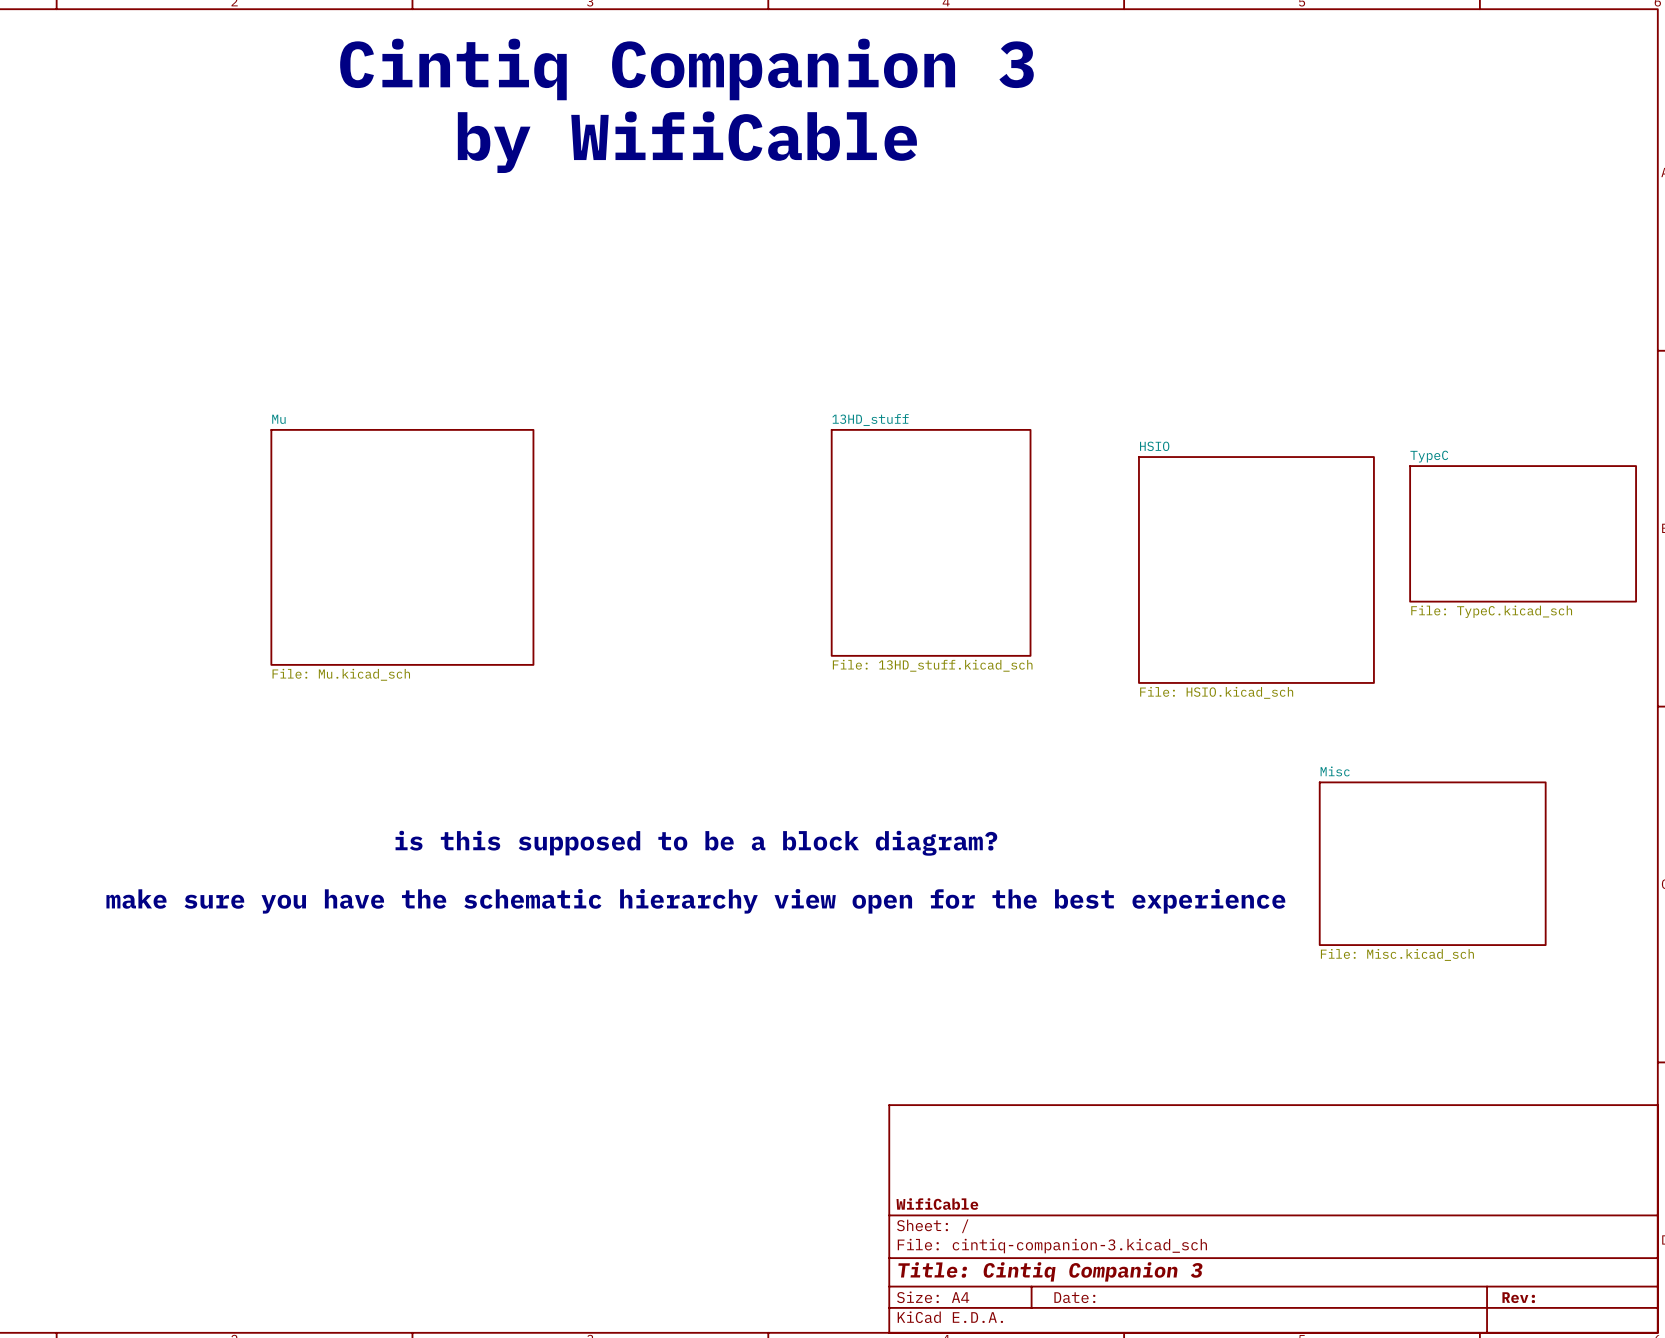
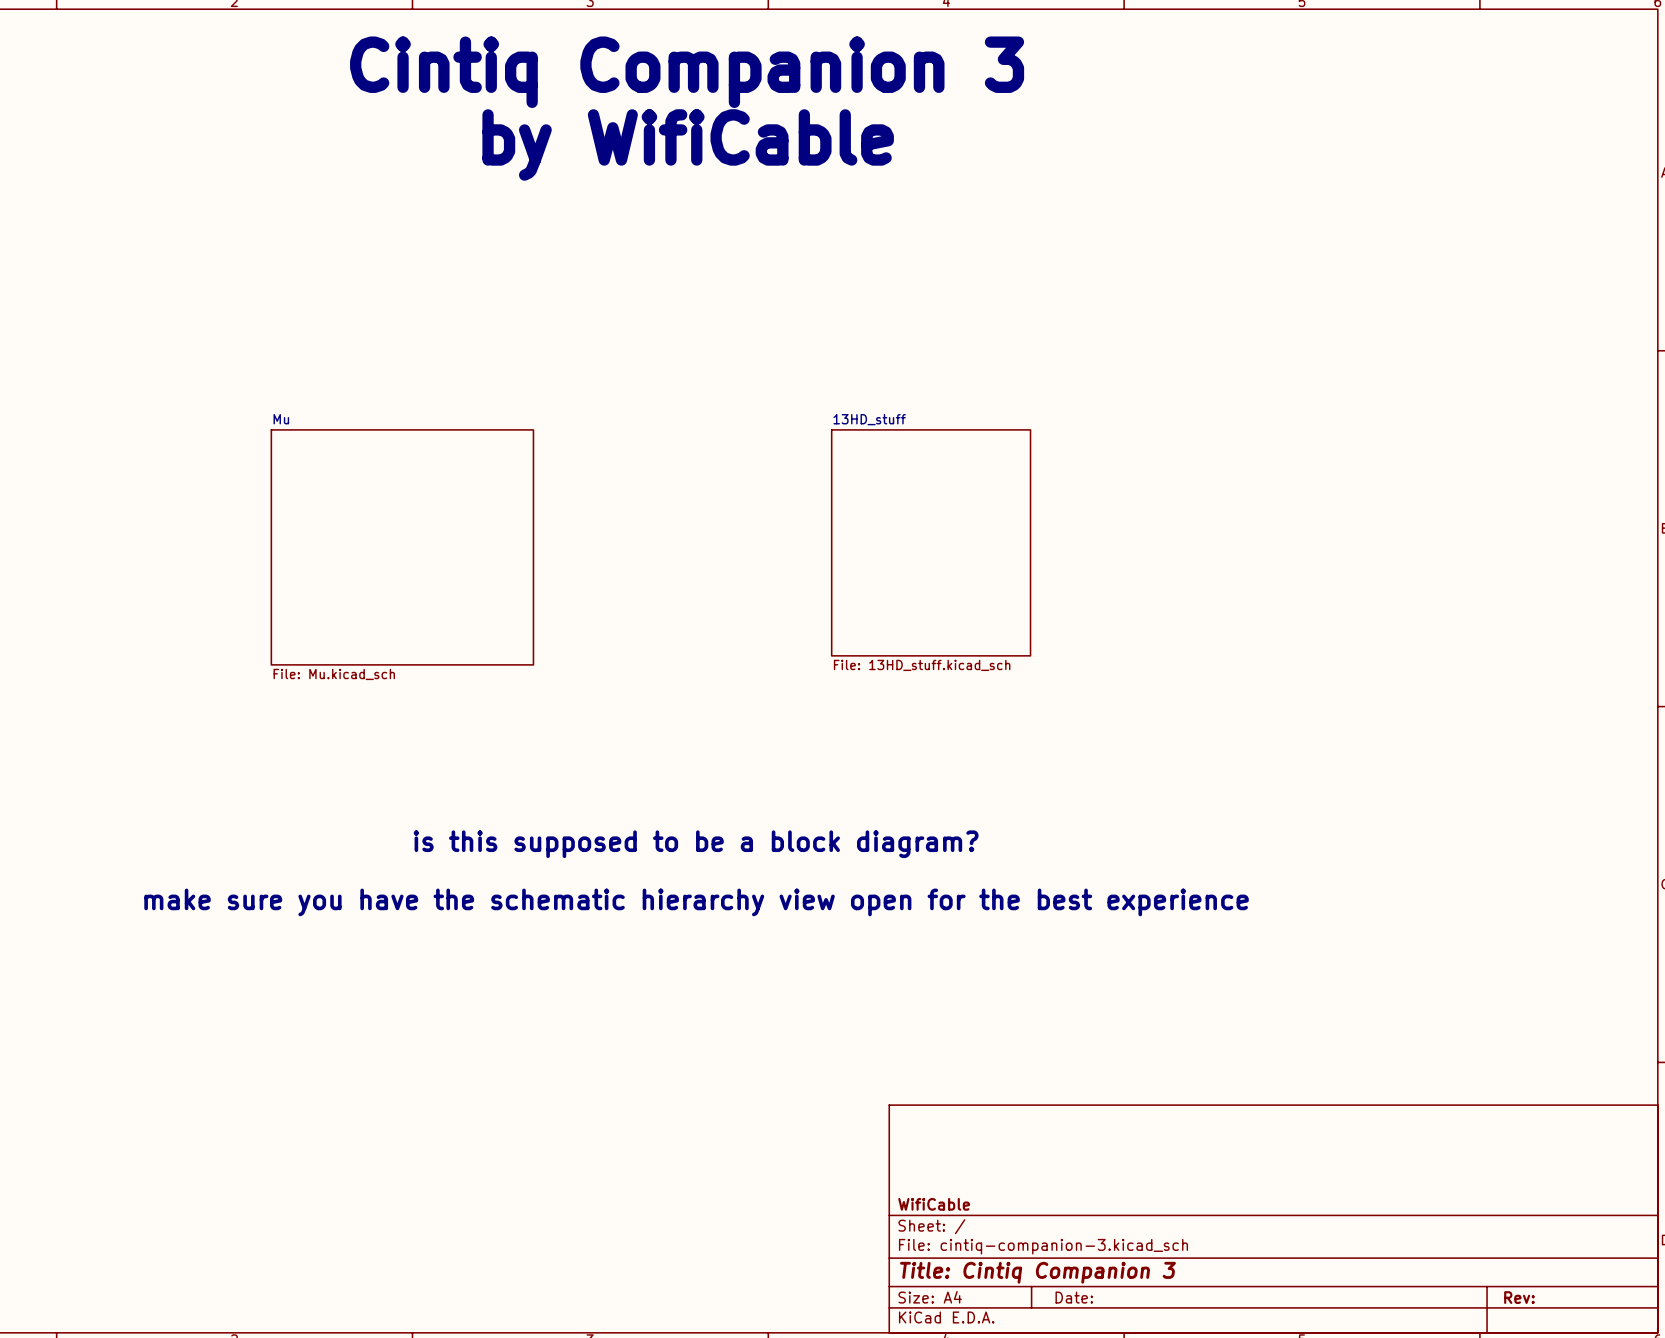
sheet TypeC: File: TypeC.kicad_sch (1523, 533) -> none
sheet HSIO: File: HSIO.kicad_sch (1256, 570) -> none
sheet Misc: File: Misc.kicad_sch (1432, 863) -> none

